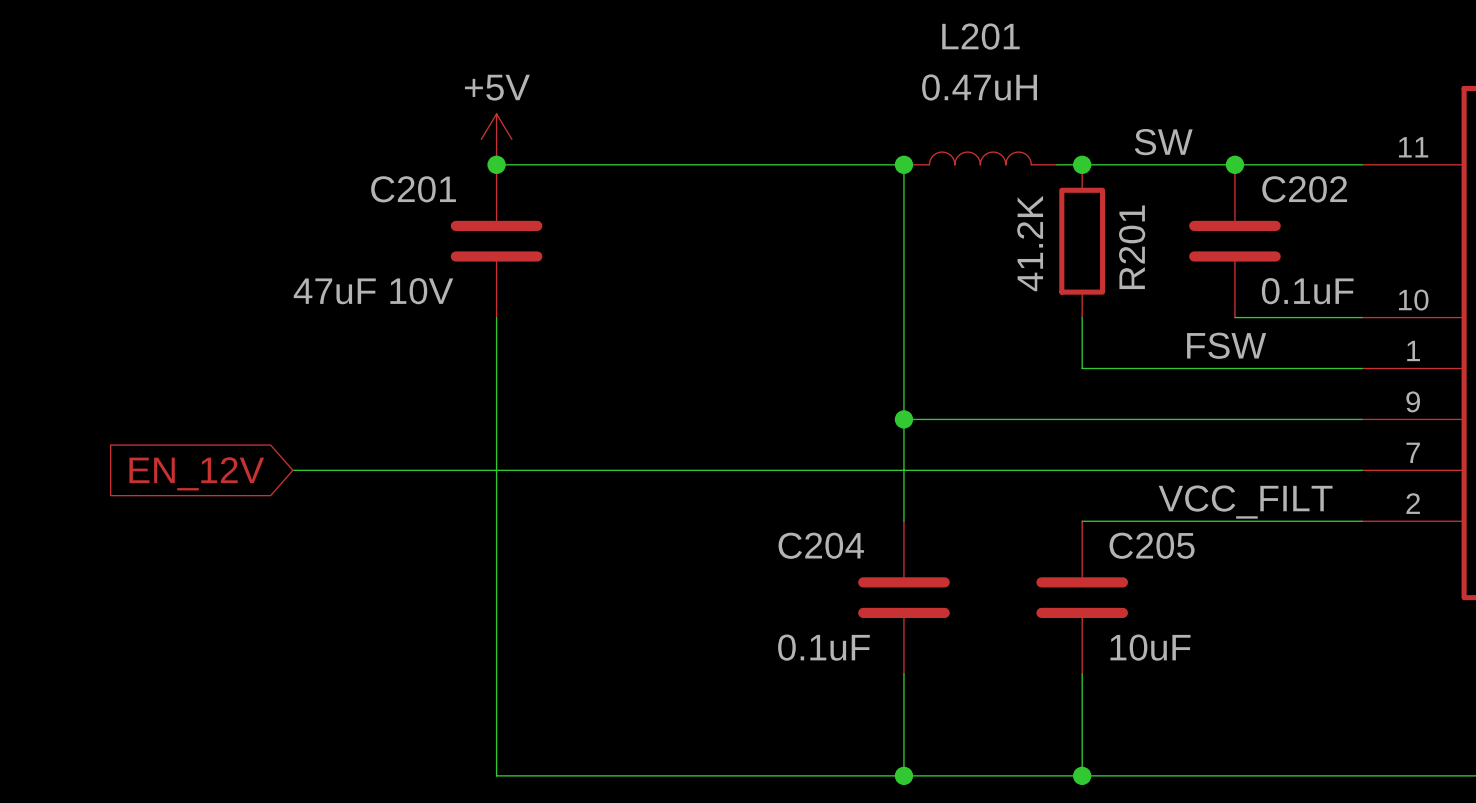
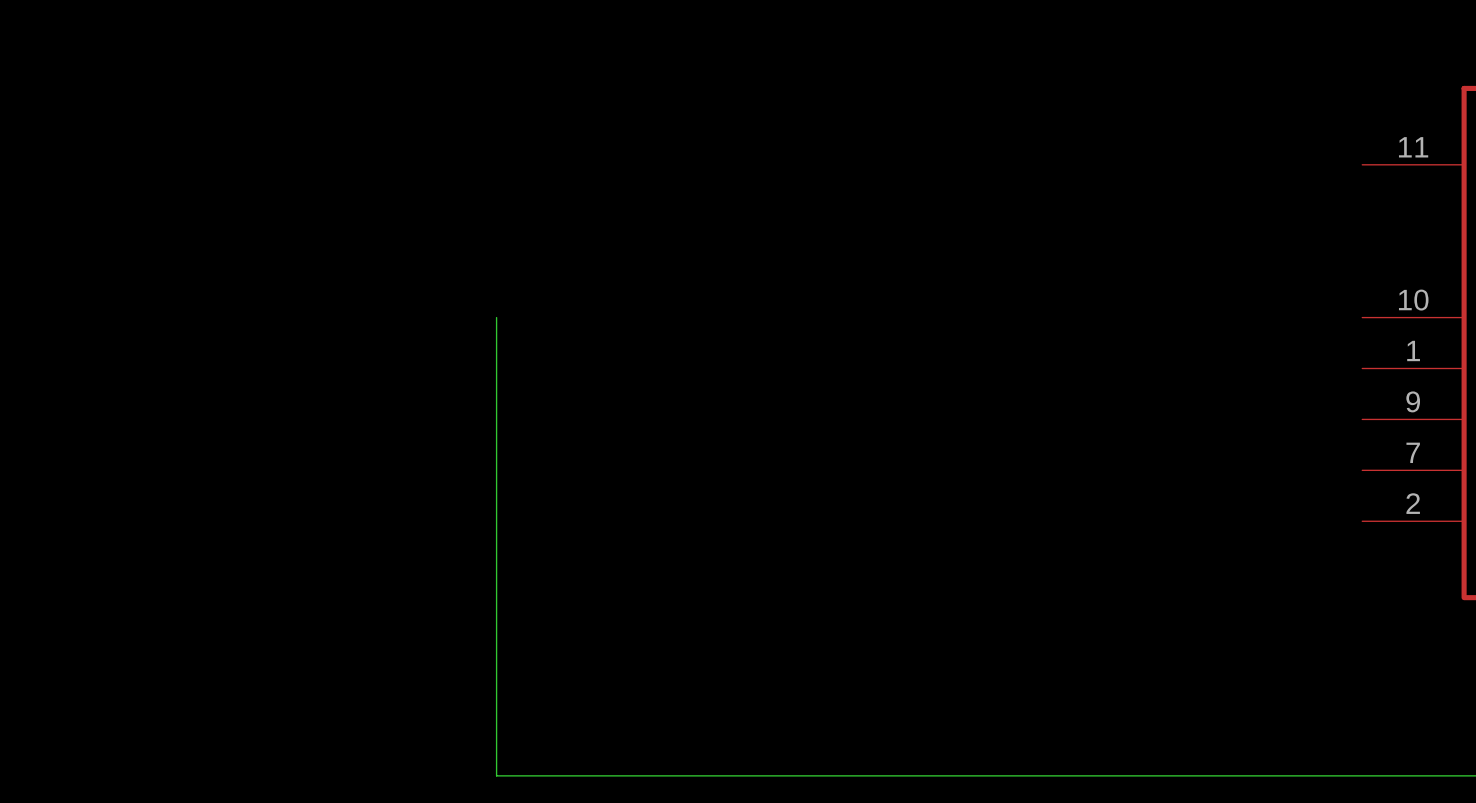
power symbol: +5V (496, 139) -> none
label: SW (1163, 142) -> none
L201: 0.47uH (980, 158) -> none
wire: (496, 164) (903, 164) (903, 521) -> none
junction: (496, 164) -> none
junction: (903, 164) -> none
wire: (1056, 164) (1362, 164) -> none
junction: (1082, 164) -> none
junction: (1234, 164) -> none
C201: 47uF 10V (496, 241) -> none
R201: 41.2K (1082, 241) -> none
C202: 0.1uF (1234, 241) -> none
wire: (1082, 317) (1082, 368) (1362, 368) -> none
wire: (1234, 317) (1362, 317) -> none
label: FSW (1226, 345) -> none
wire: (903, 419) (1362, 419) -> none
junction: (903, 419) -> none
wire: (292, 470) (1362, 470) -> none
global label: EN_12V (196, 473) -> none
label: VCC_FILT (1245, 502) -> none
wire: (1082, 521) (1362, 521) -> none
C204: 0.1uF (903, 597) -> none
C205: 10uF (1082, 597) -> none
wire: (903, 674) (903, 775) -> none
wire: (1082, 674) (1082, 775) -> none
junction: (903, 775) -> none
junction: (1082, 775) -> none

